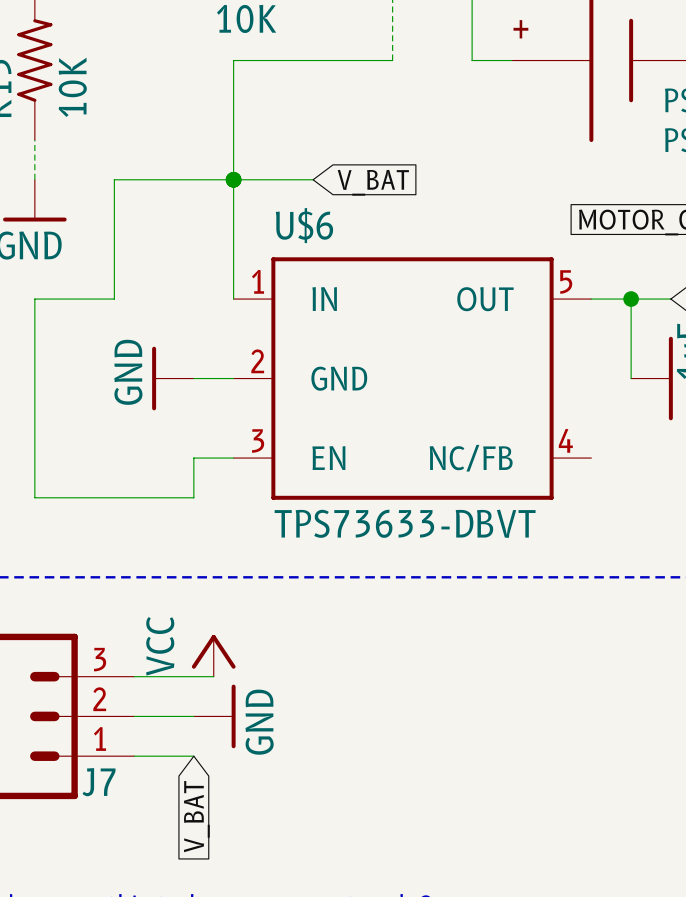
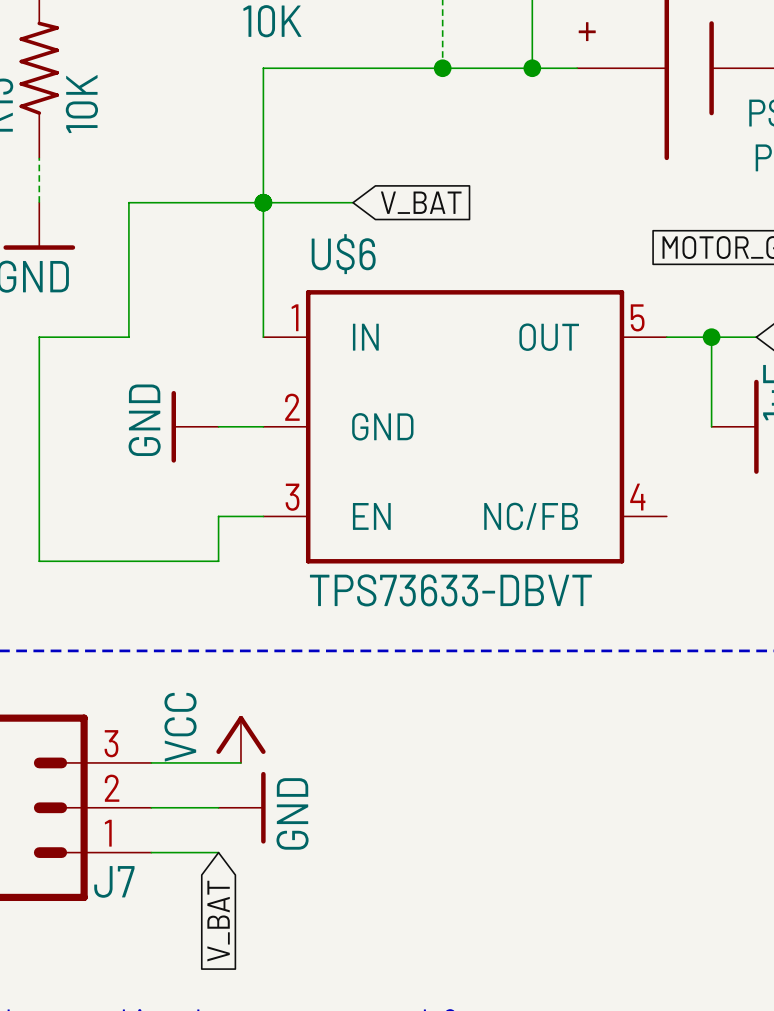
wire: none -> (442, 68) (532, 68)
junction: none -> (442, 68)
junction: none -> (532, 68)

